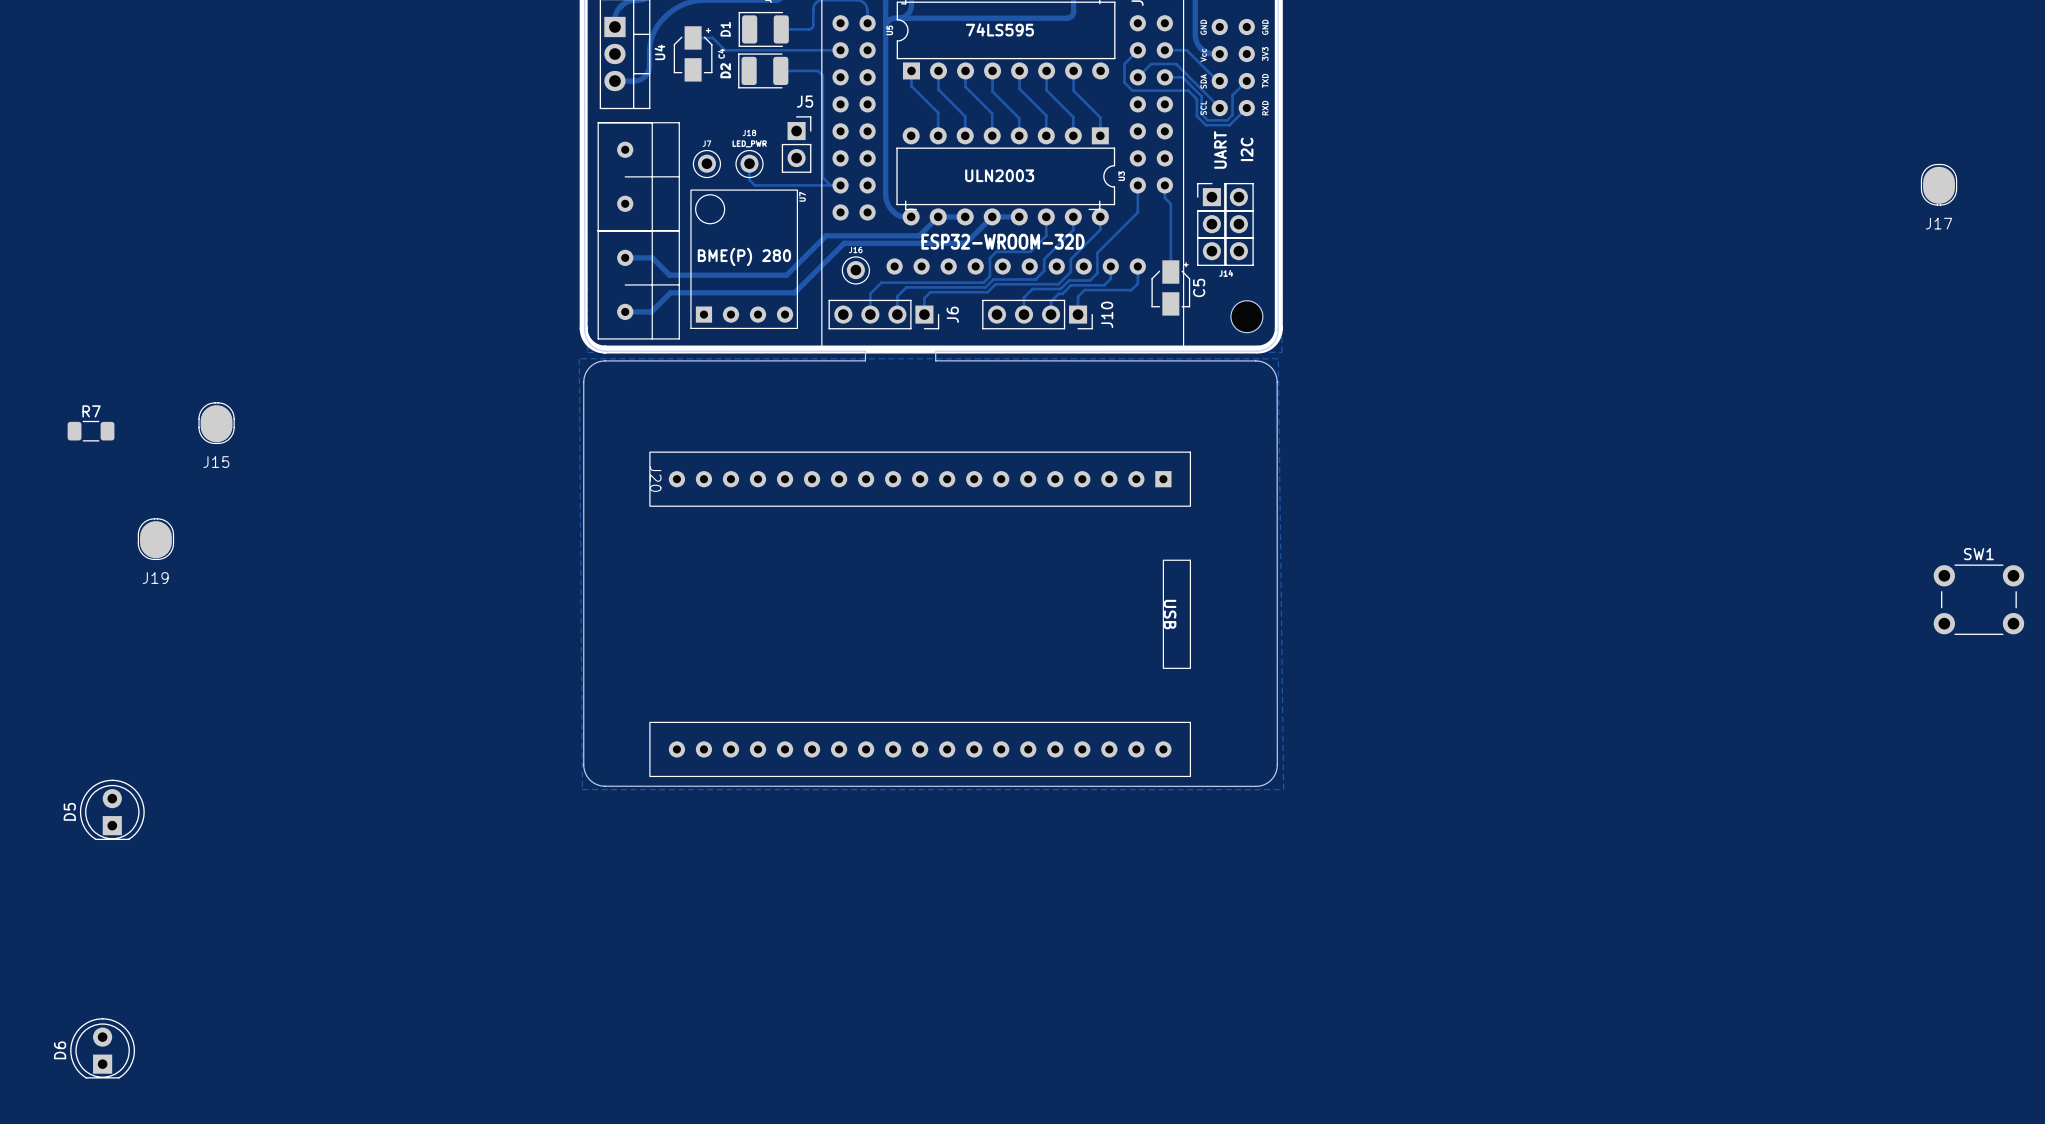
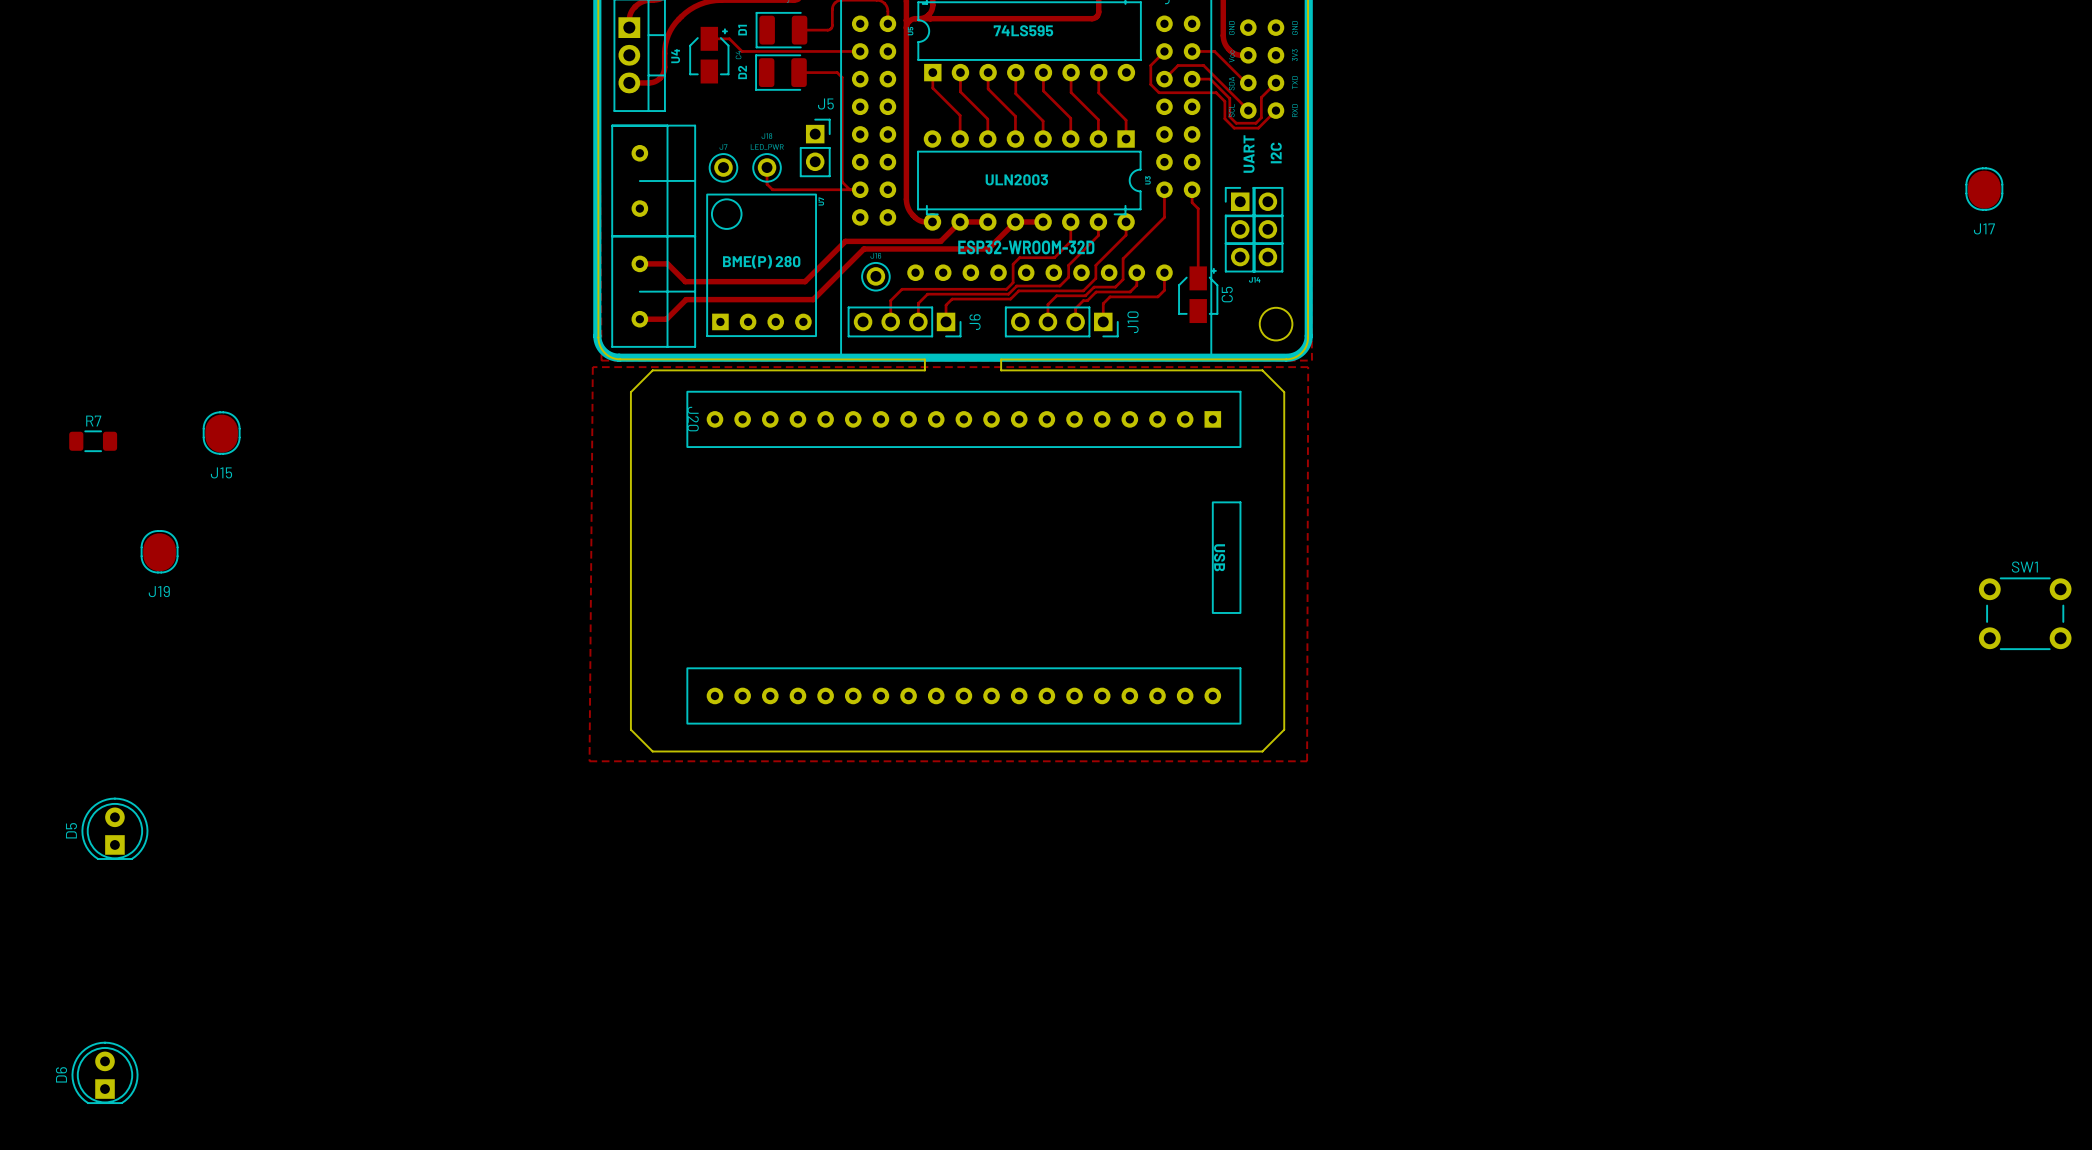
board edge: (1256, 351) (935, 351) (935, 360) (1255, 360) (1265, 363) (1272, 368) (1277, 382) (1277, 765) (1274, 776) (1267, 783) (1256, 786) (605, 786) (593, 782) (587, 776) (583, 764) (583, 382) (586, 371) (594, 363) (605, 360) (865, 360) (865, 351) -> (1286, 359) (1001, 359) (1001, 370) (1262, 370) (1284, 392) (1284, 729) (1262, 751) (652, 751) (630, 729) (630, 392) (652, 370) (924, 370) (924, 359) (885, 359)
zone outline: (579, 358) (582, 789) (1283, 789) (1278, 358) -> (592, 367) (589, 761) (1307, 761) (1308, 367)
J20 position: (920, 614) -> (963, 557)

